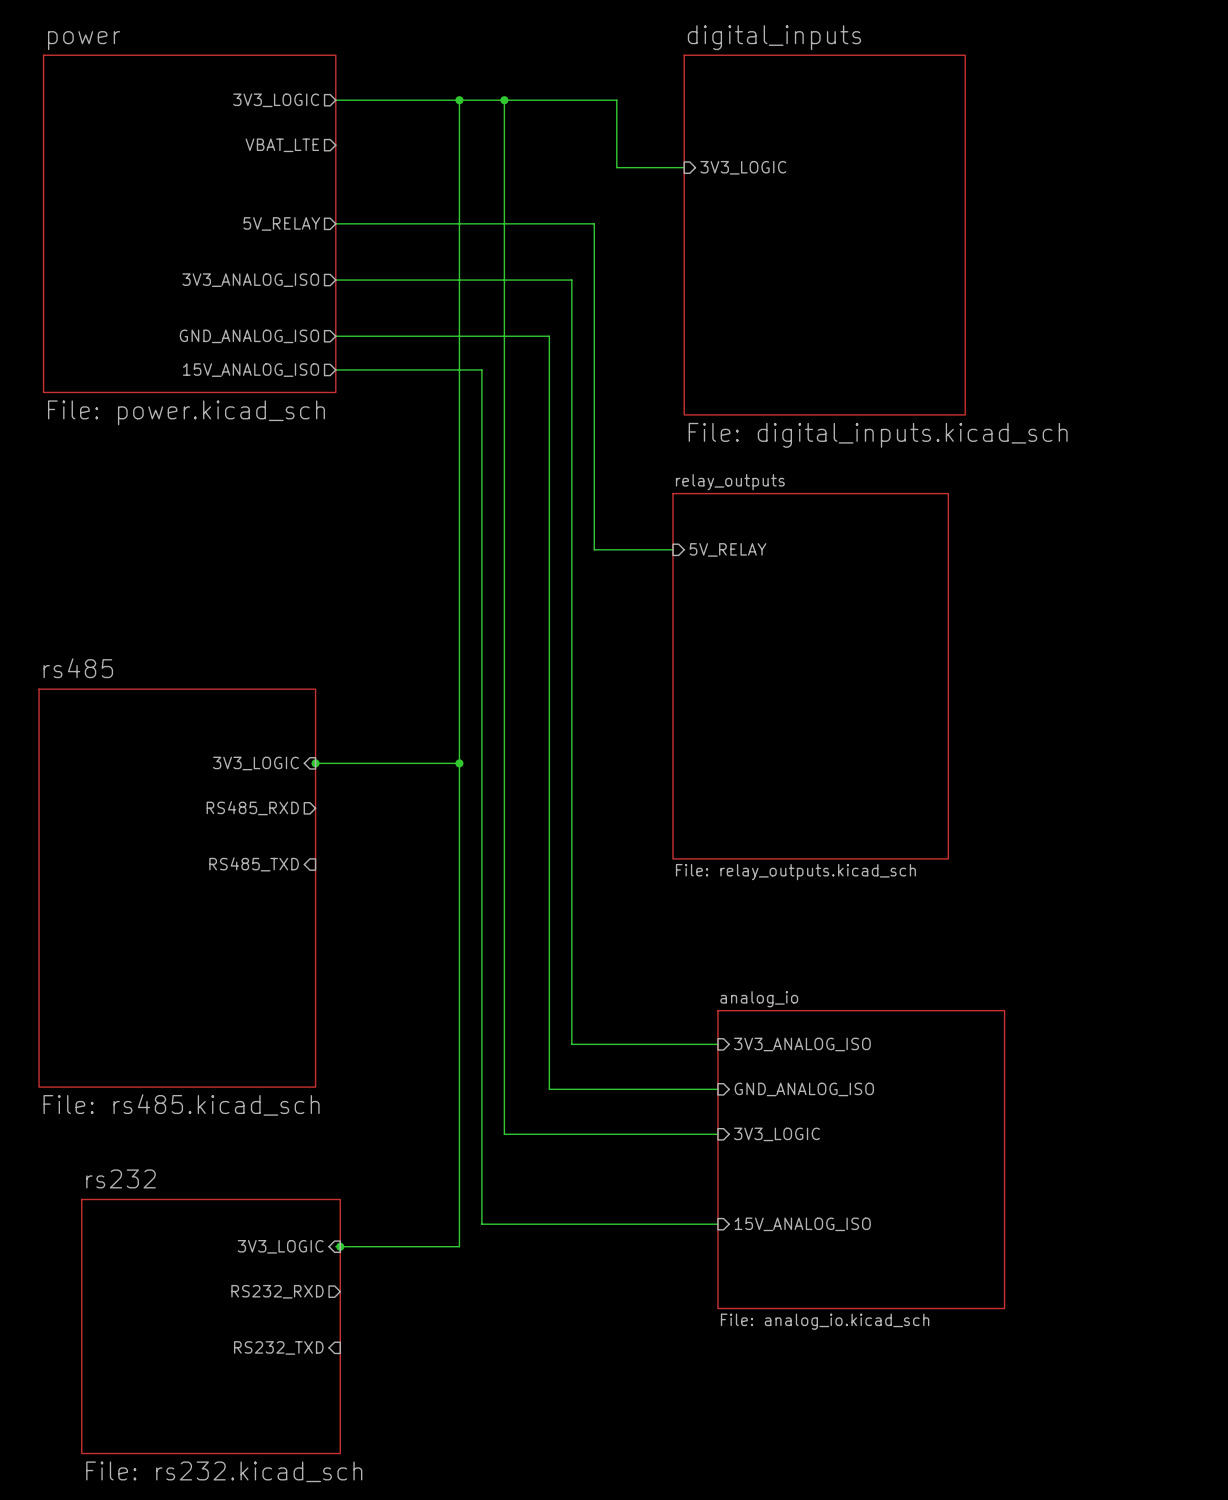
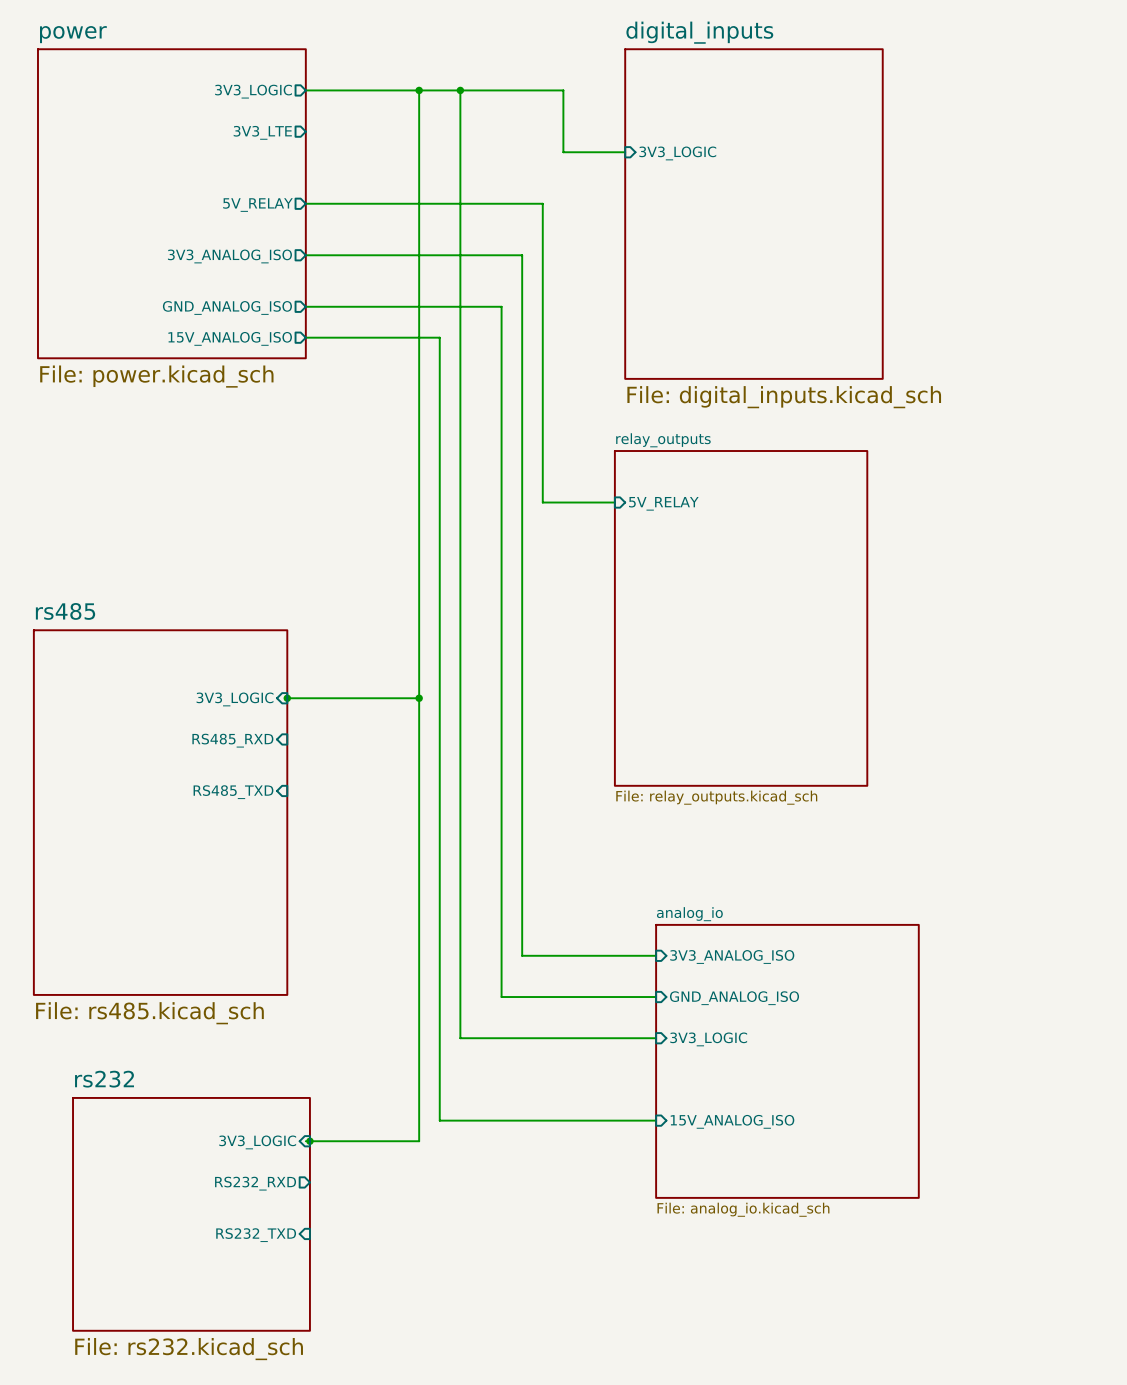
sheet pin: VBAT_LTE (282, 145) -> 3V3_LTE (262, 132)
sheet pin shape: output (252, 808) -> input (232, 740)

